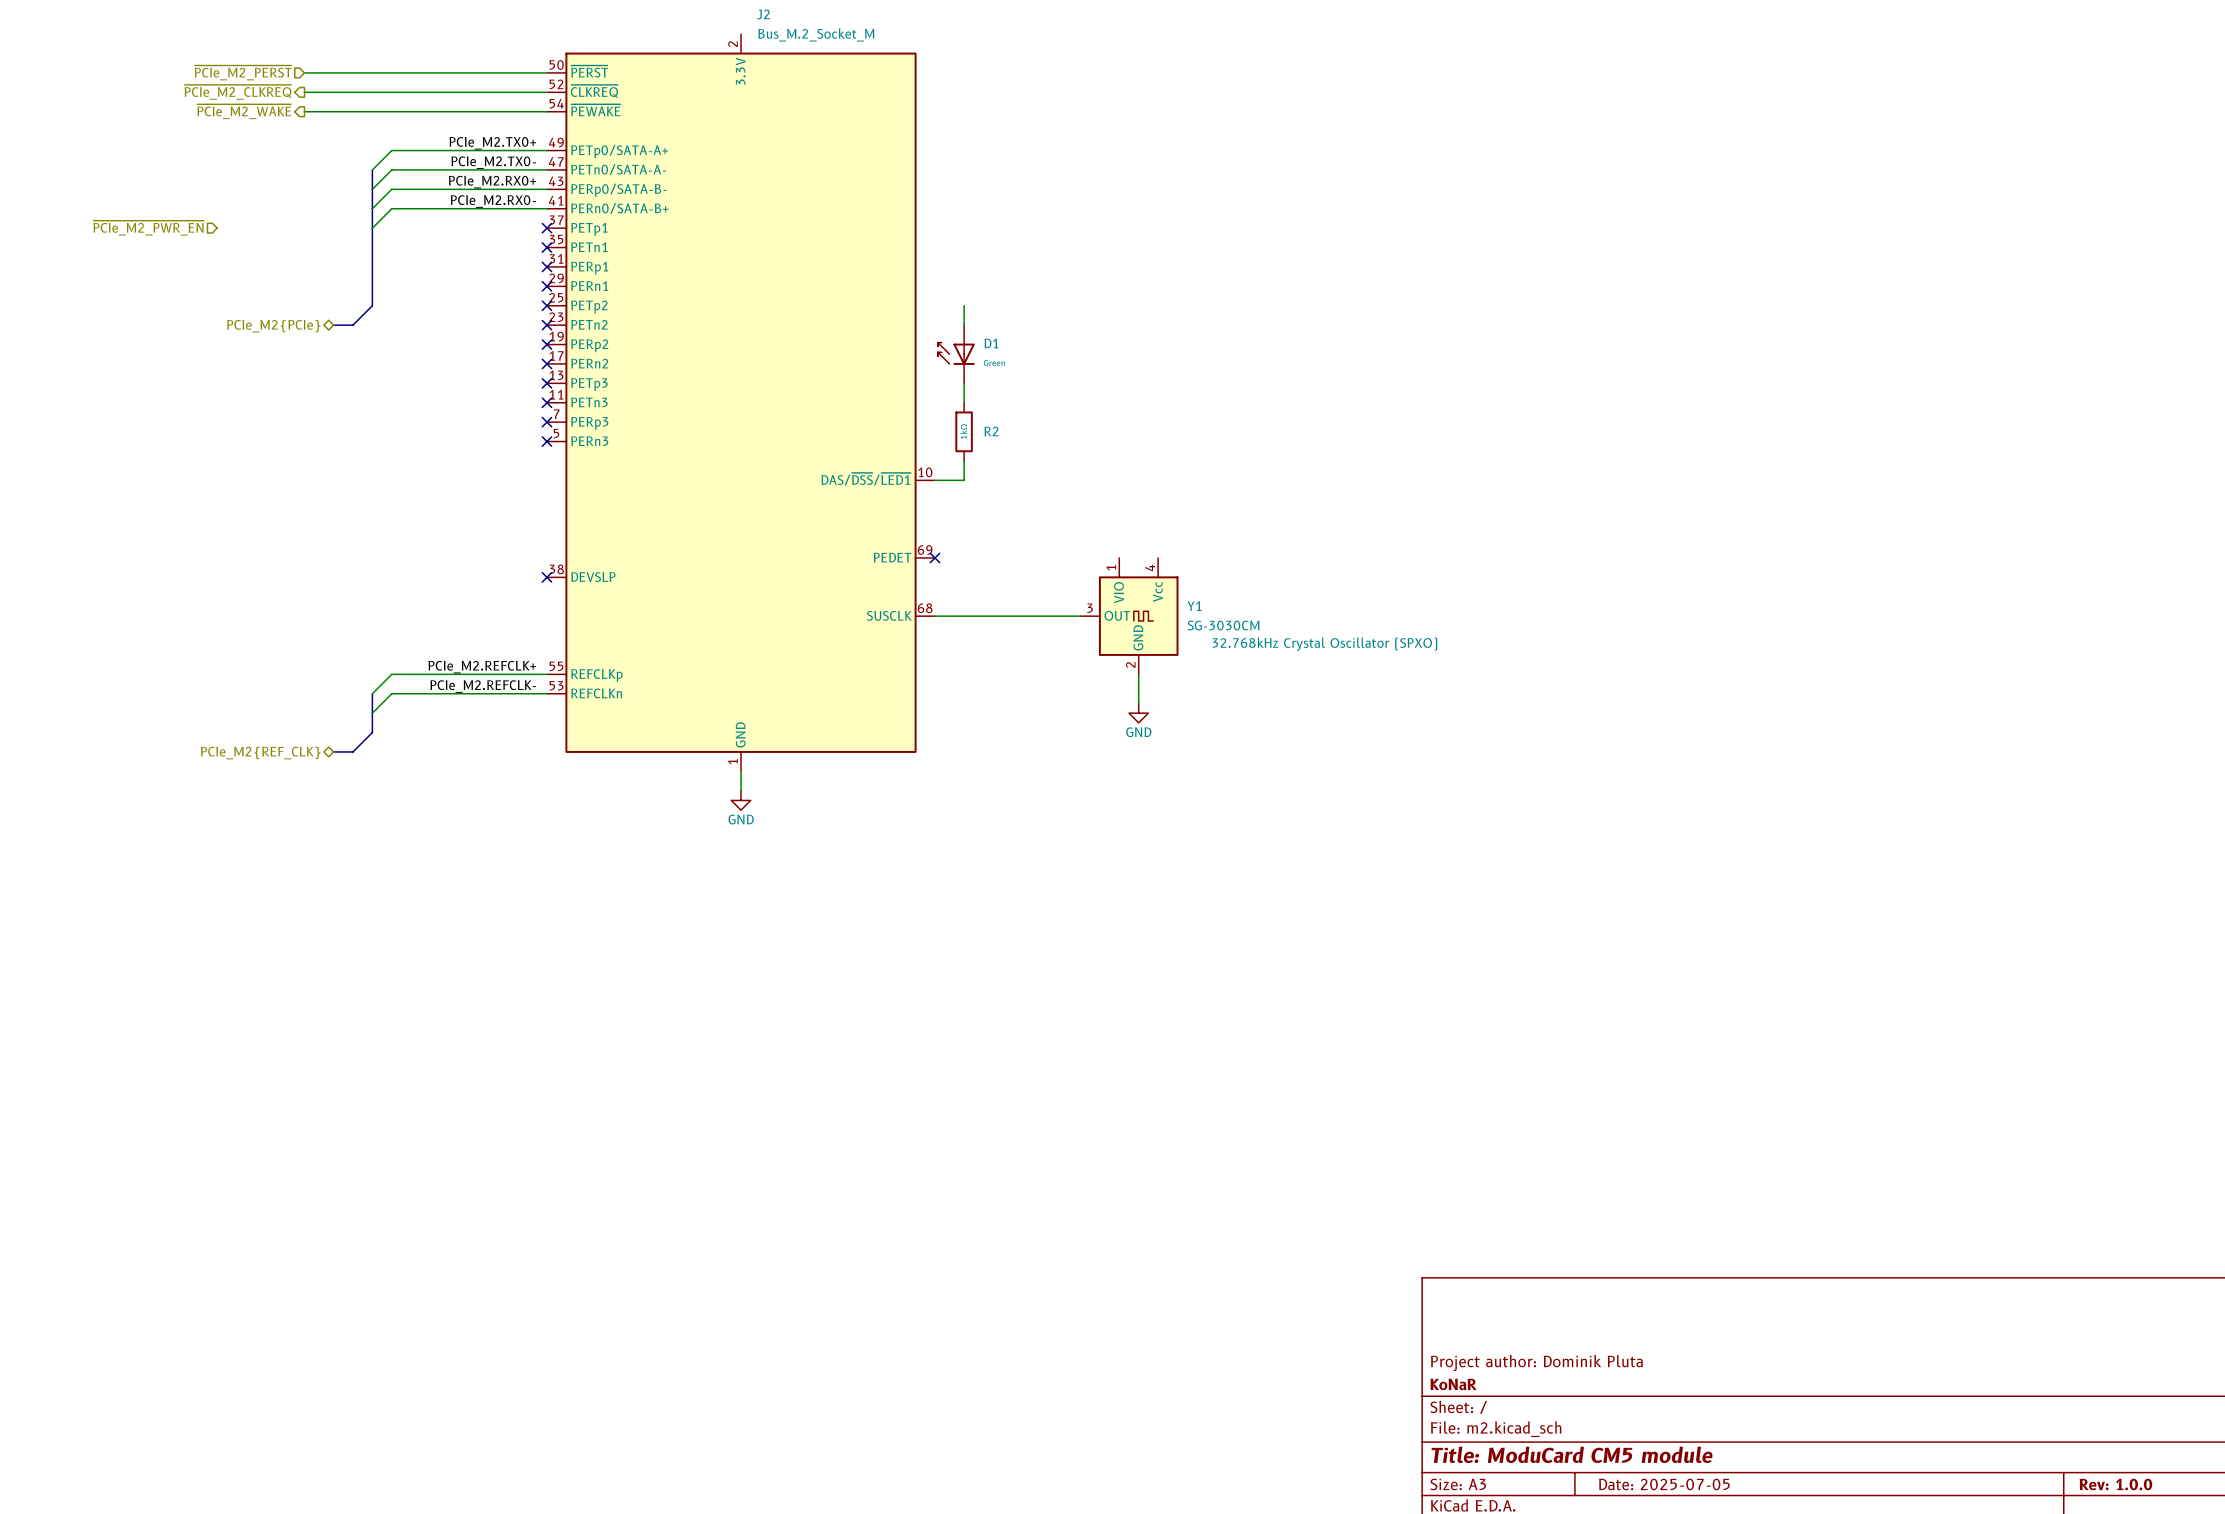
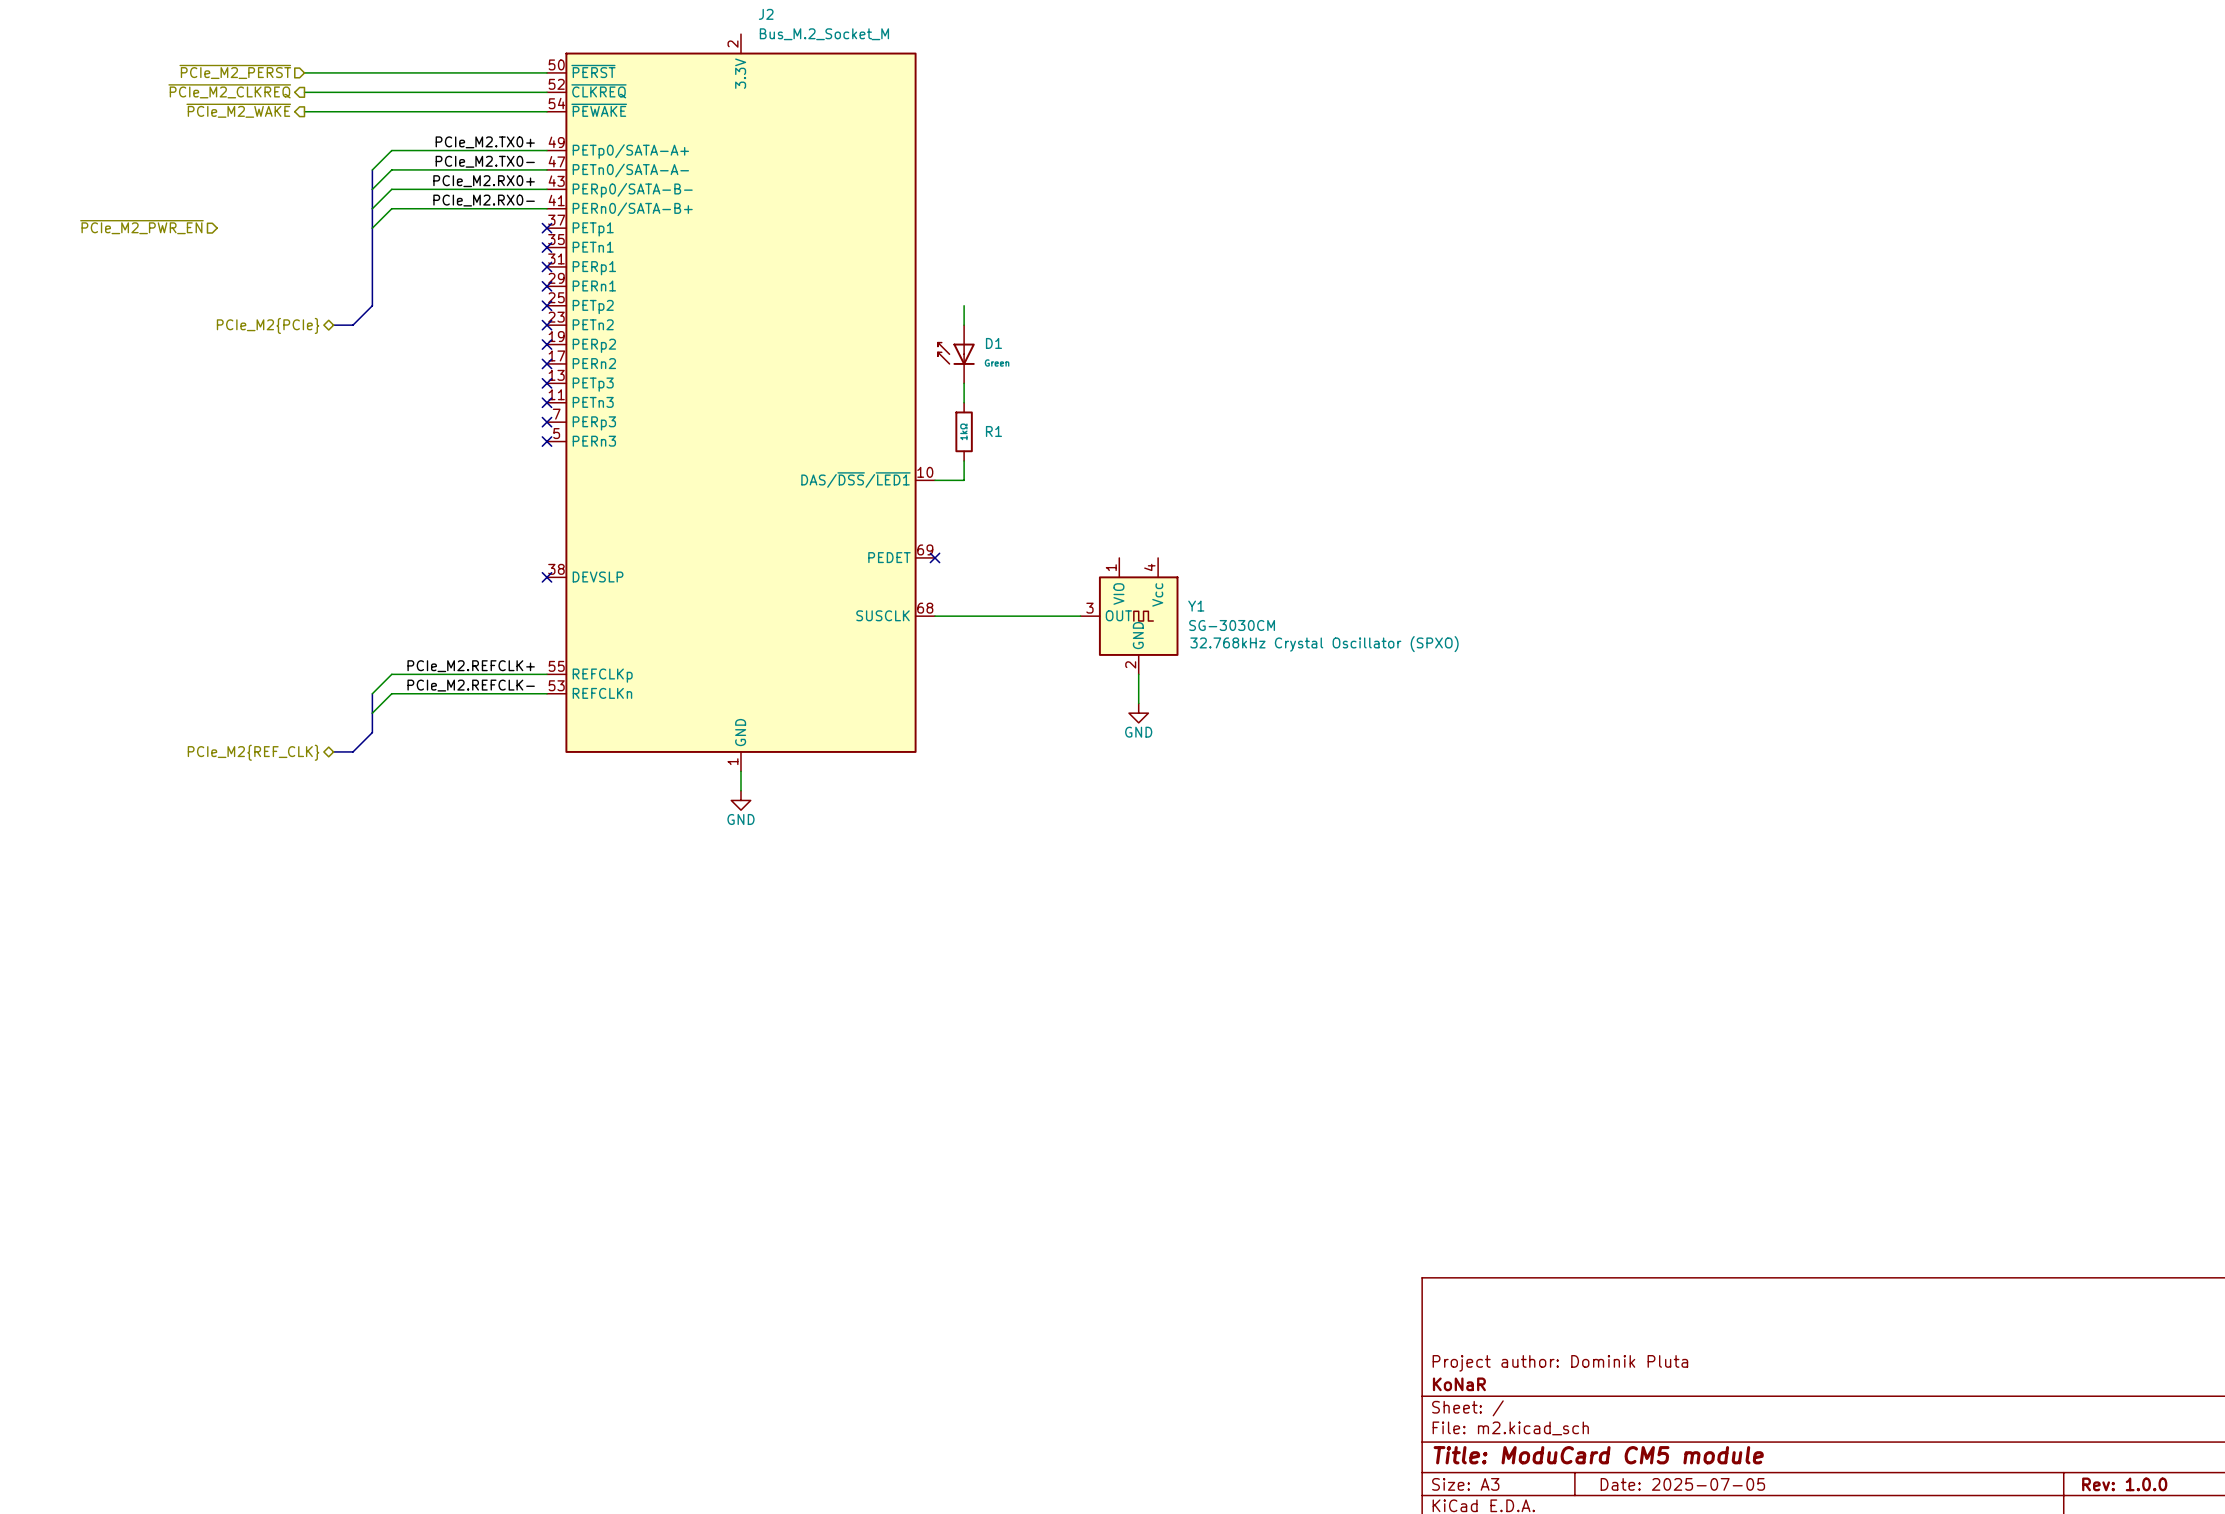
R2 name: R2 (991, 431) -> R1 (993, 431)

